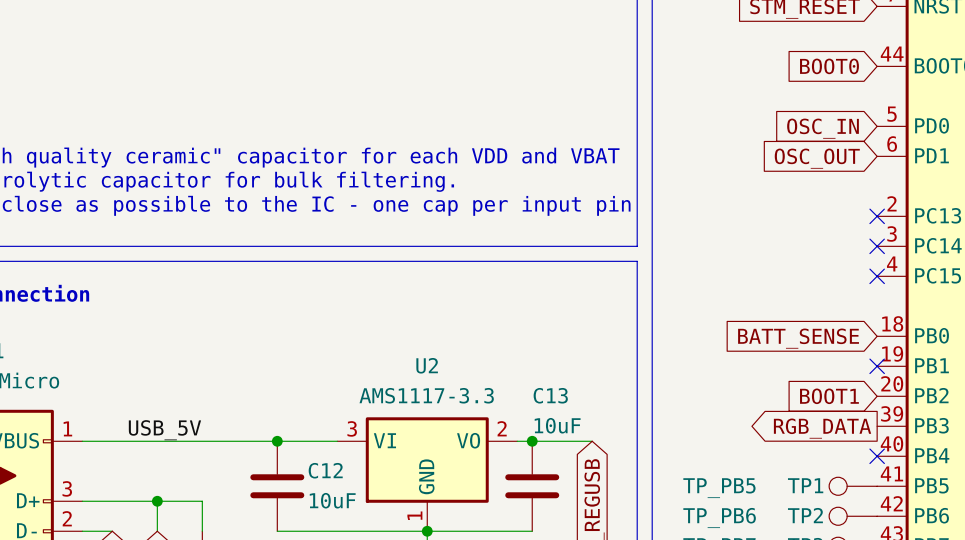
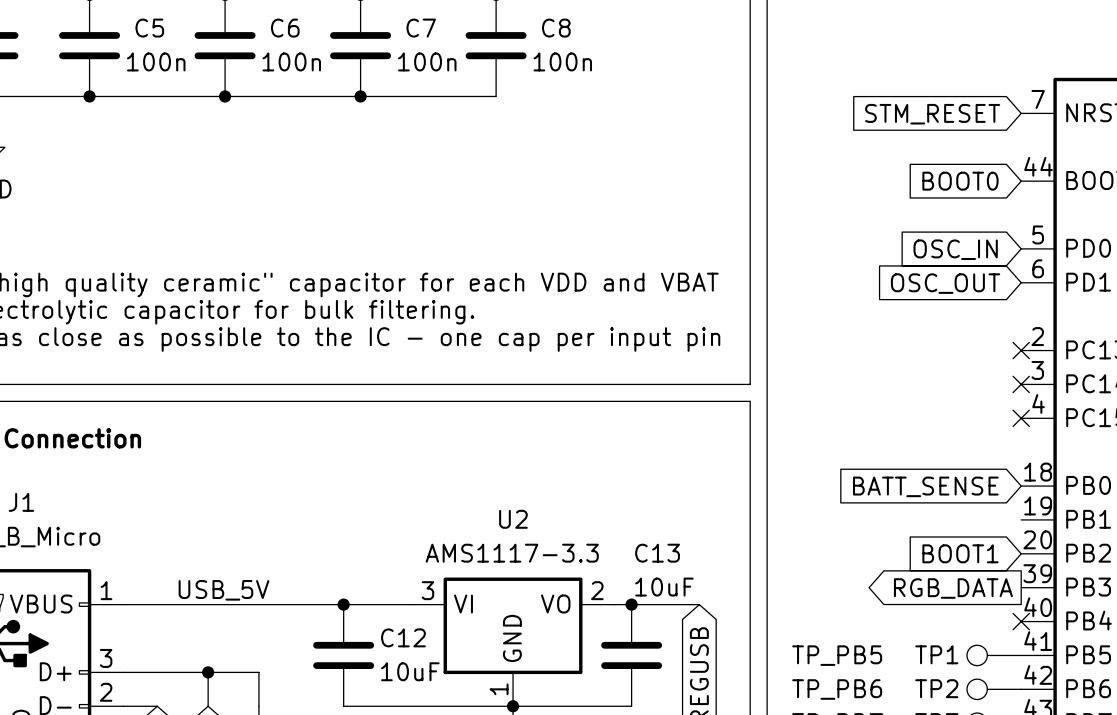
no-connect mark: (877, 366) -> none

